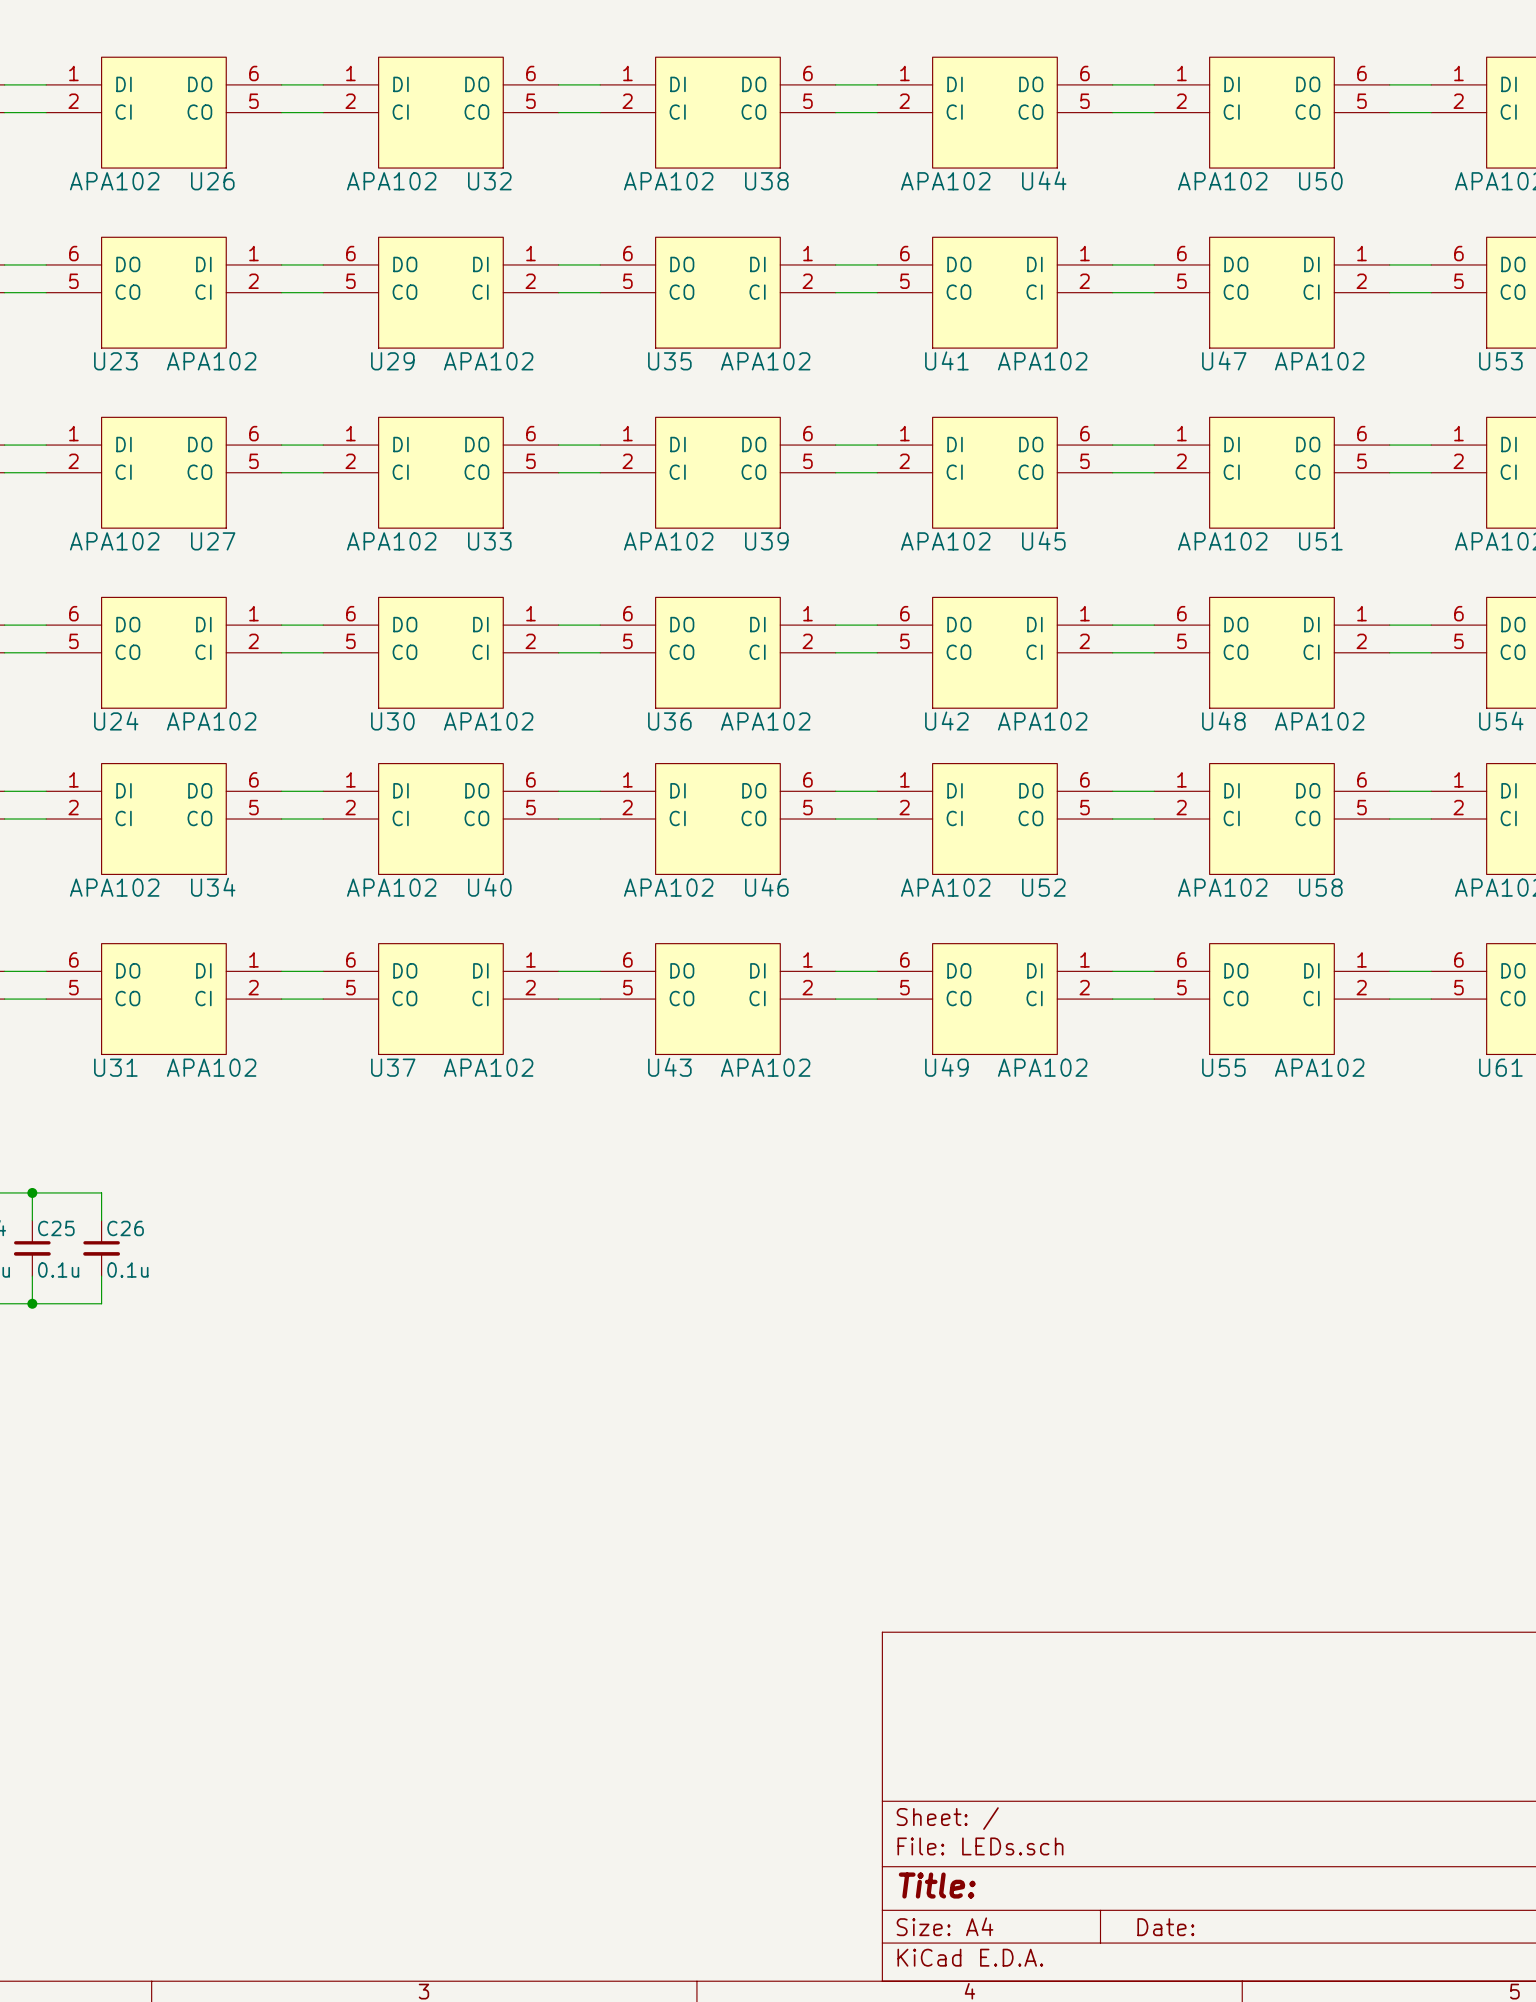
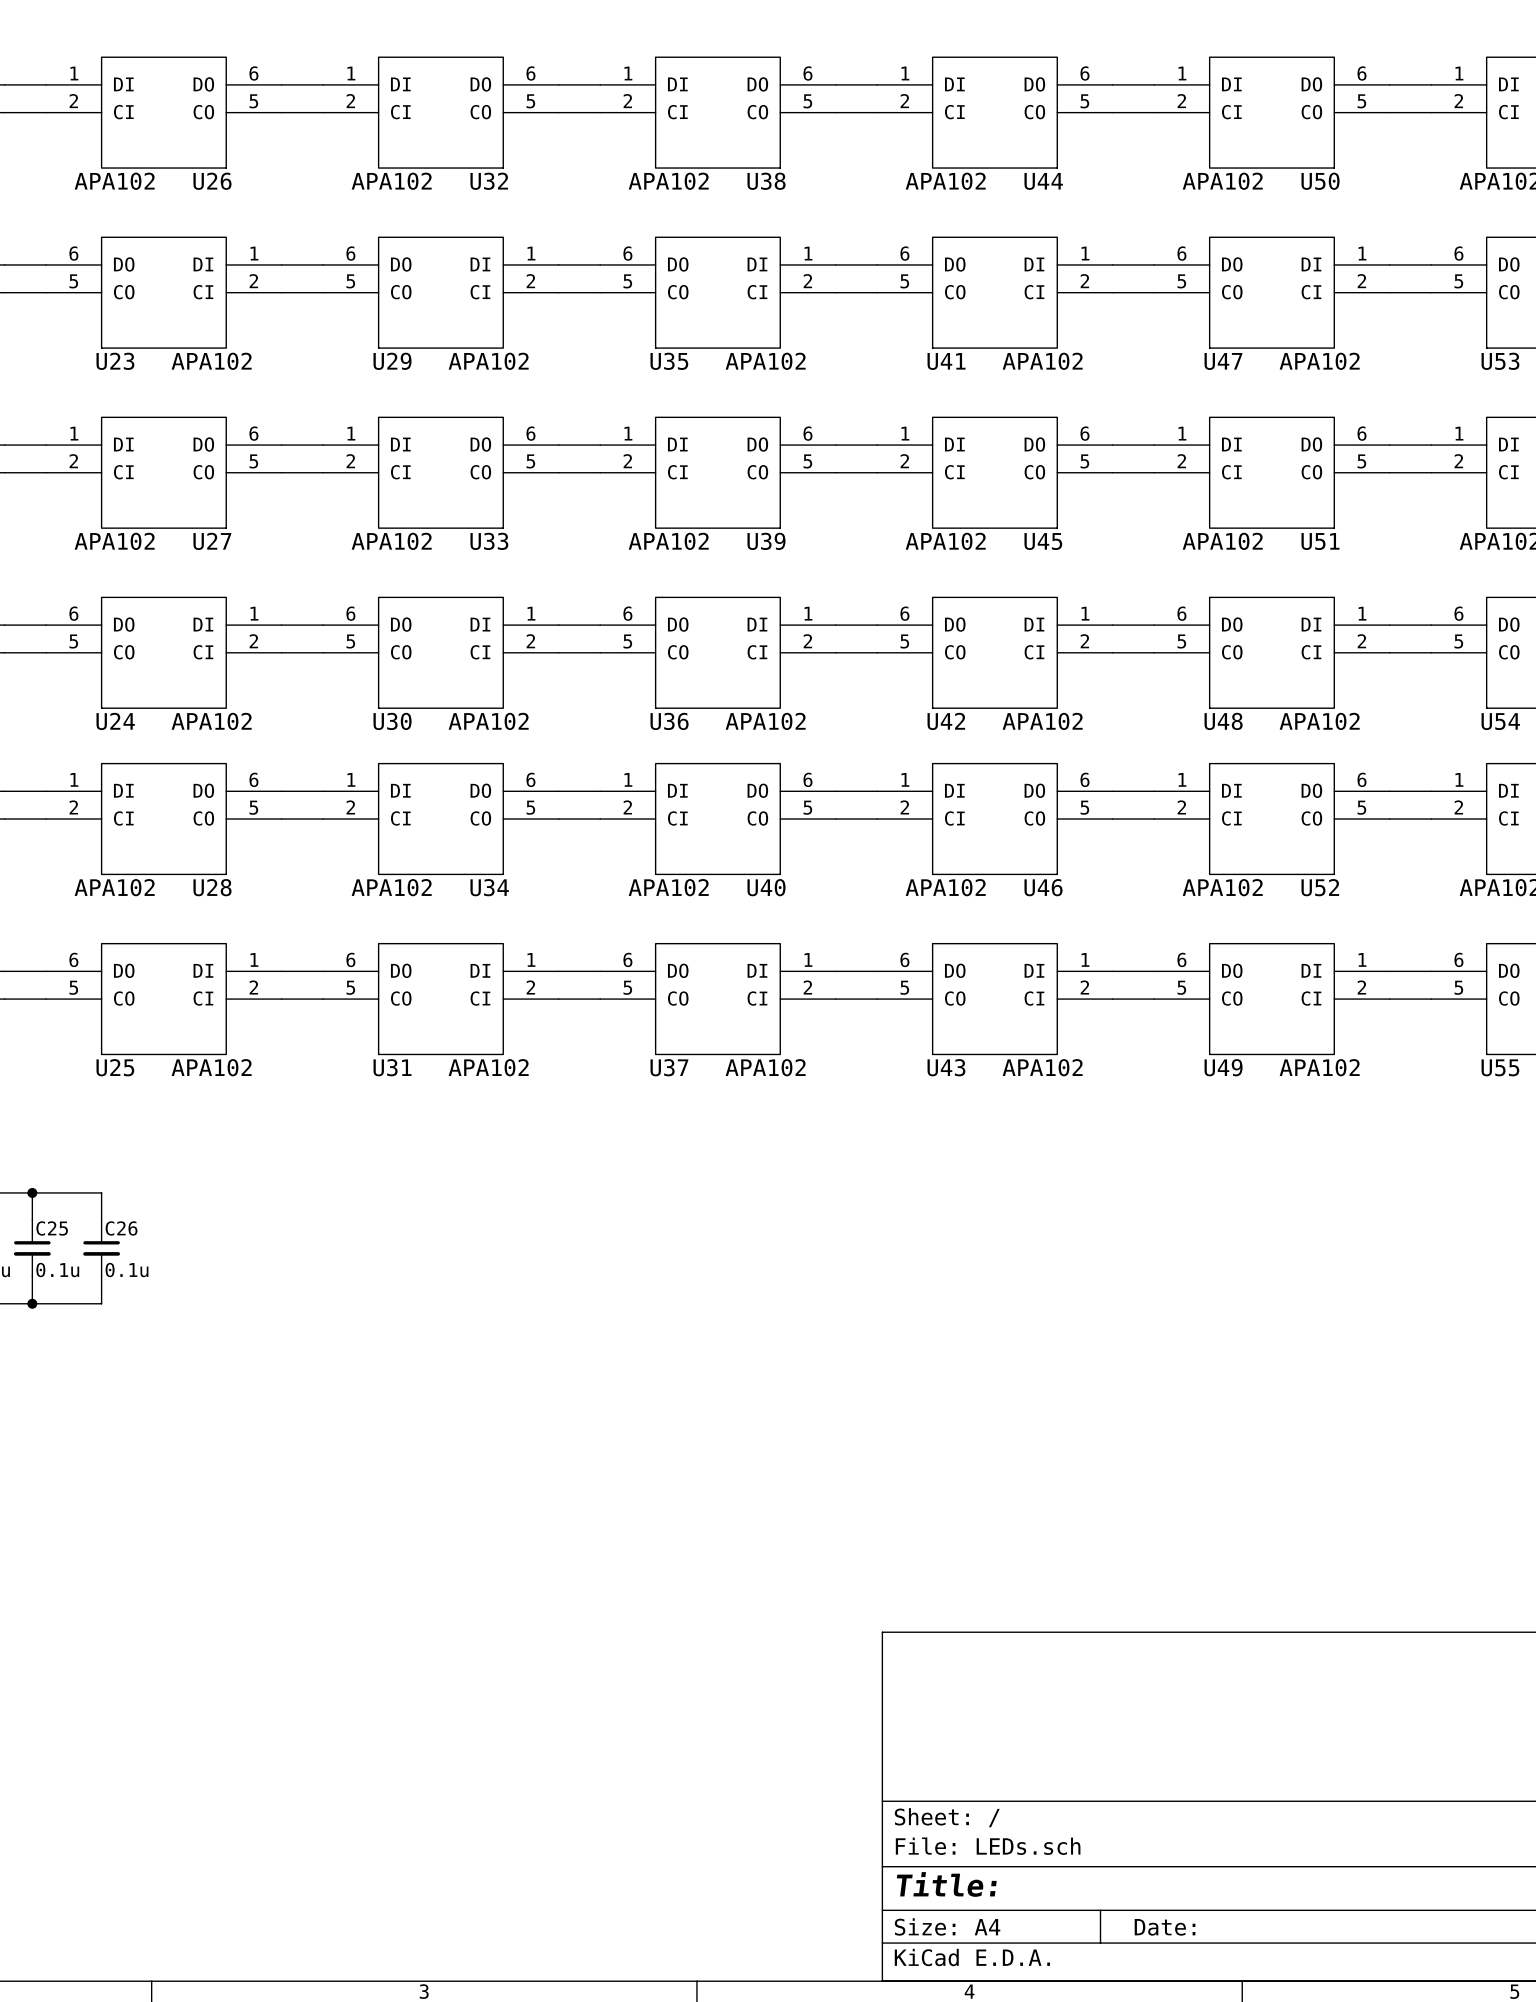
U34 name: U34 (213, 887) -> U28 (212, 887)
U40 name: U40 (489, 887) -> U34 (489, 887)
U46 name: U46 (766, 887) -> U40 (766, 887)
U52 name: U52 (1043, 887) -> U46 (1043, 887)
U58 name: U58 (1320, 887) -> U52 (1320, 887)
U31 name: U31 (115, 1067) -> U25 (115, 1067)
U37 name: U37 (393, 1067) -> U31 (392, 1067)
U43 name: U43 (669, 1067) -> U37 (669, 1067)
U49 name: U49 (946, 1067) -> U43 (946, 1067)
U55 name: U55 (1223, 1067) -> U49 (1223, 1067)
U61 name: U61 (1500, 1067) -> U55 (1500, 1067)

